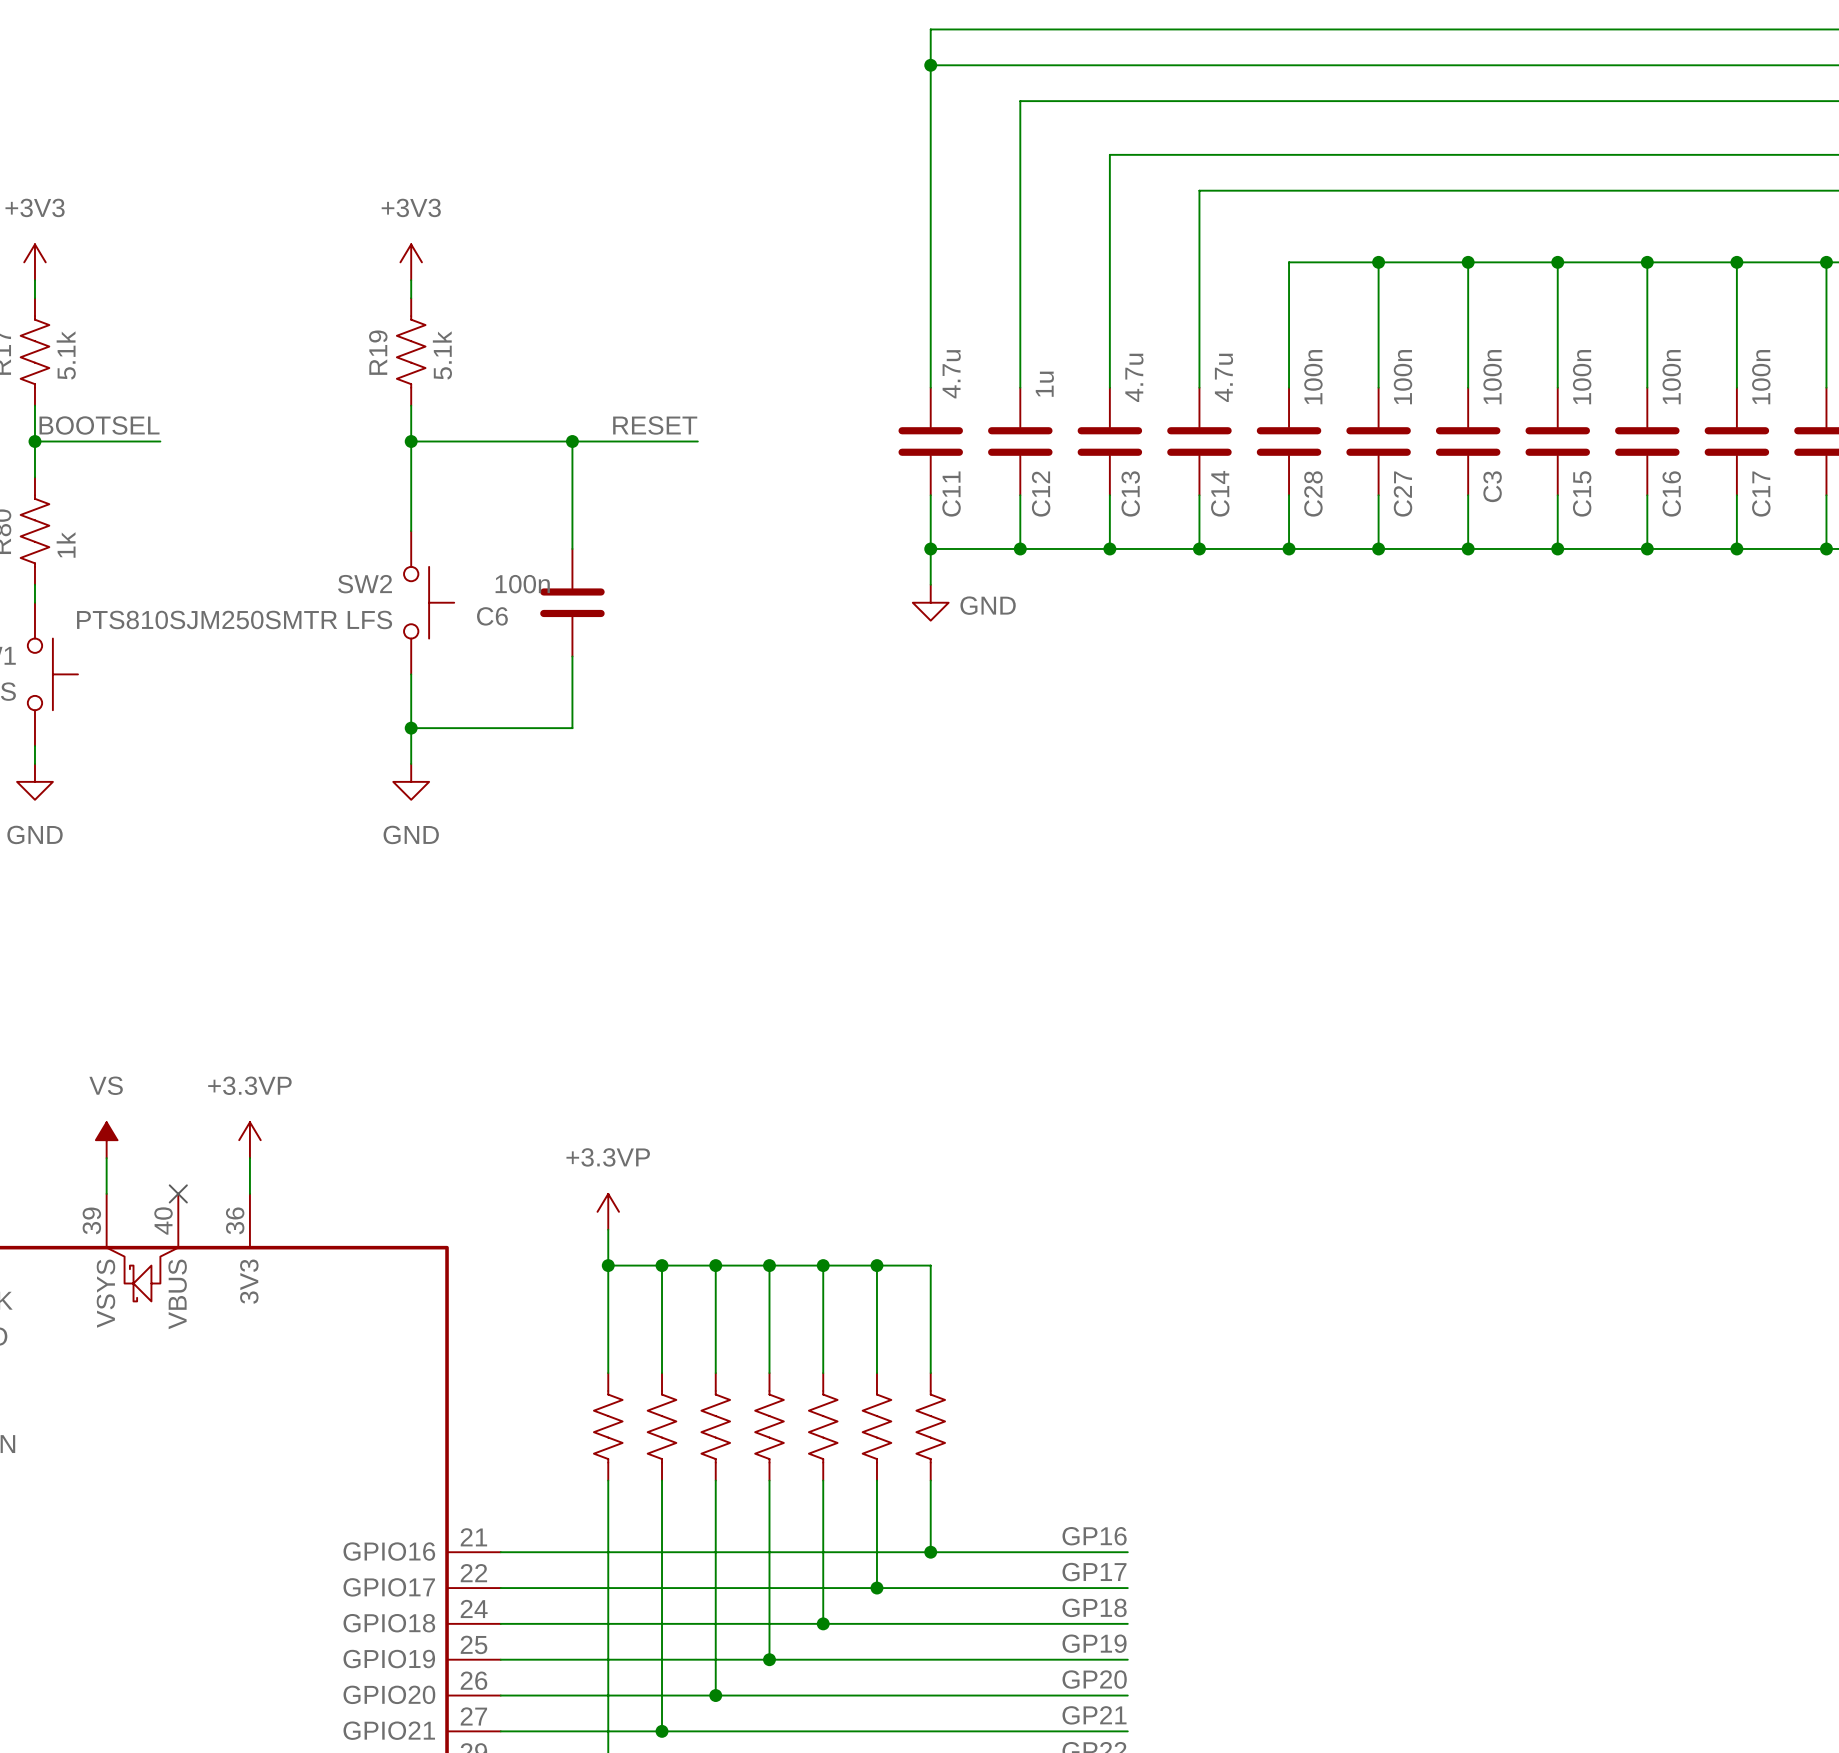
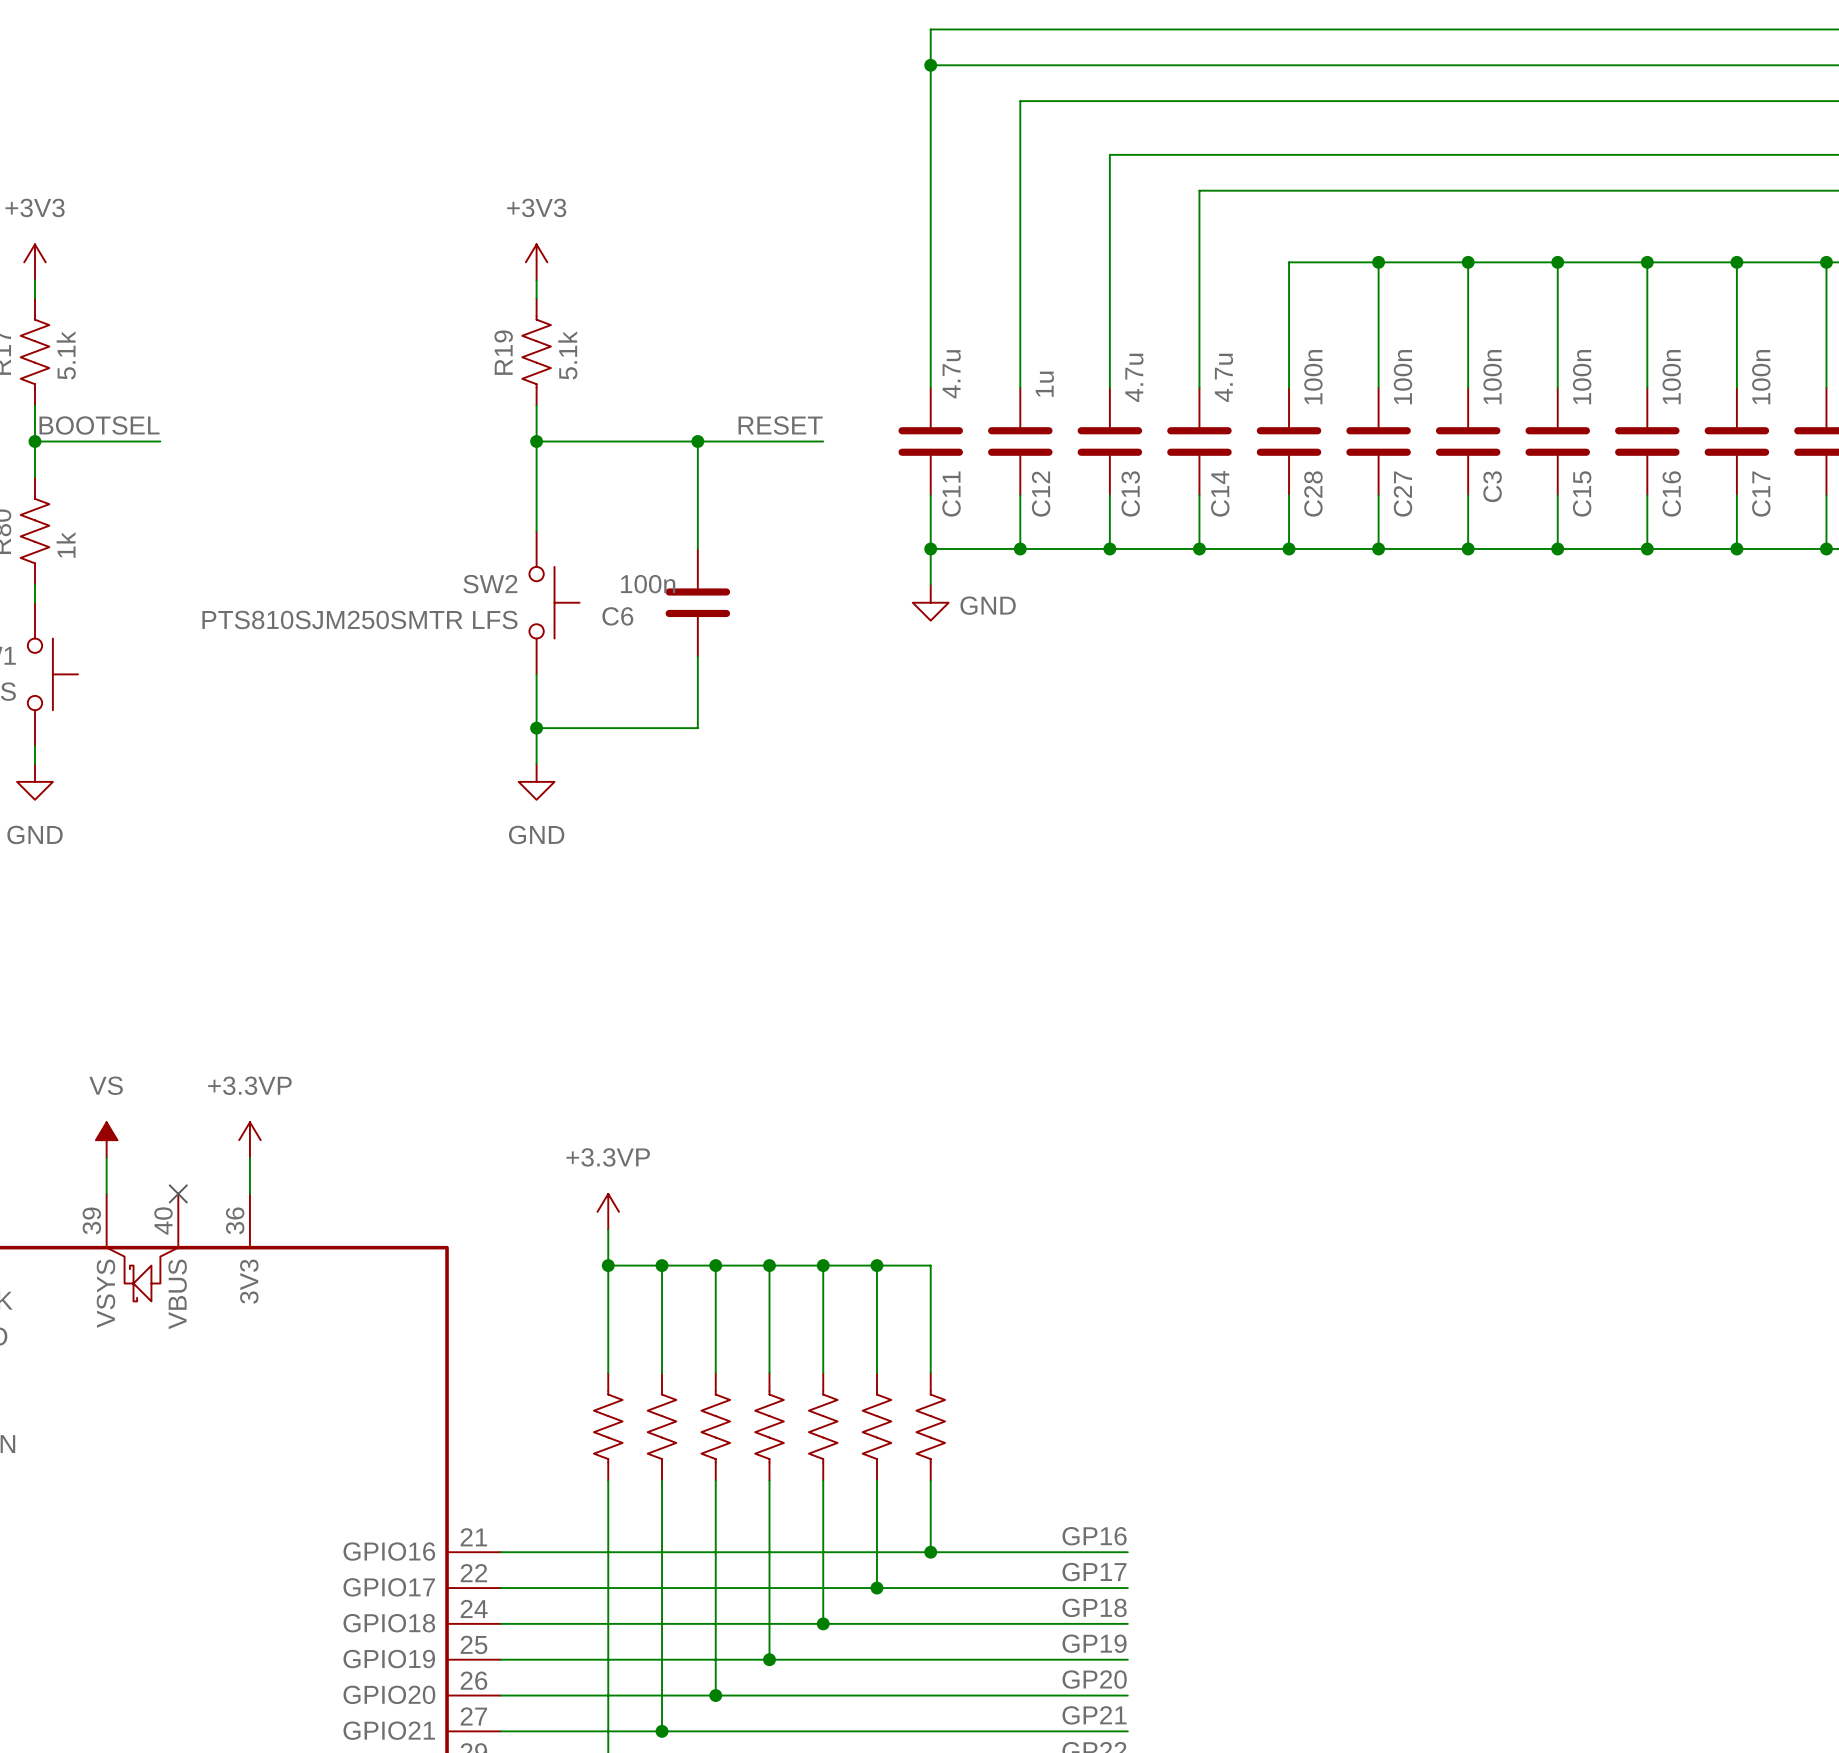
power symbol position: +3V3 (411, 262) -> +3V3 (536, 262)
wire: (411, 280) (411, 298) -> (536, 280) (536, 298)
R19 position: (411, 351) -> (536, 351)
wire: (411, 405) (411, 531) -> (536, 405) (536, 531)
label position: RESET (655, 425) -> RESET (780, 425)
wire: (411, 441) (536, 441) -> none
junction: (411, 441) -> none
wire: (572, 441) (572, 548) -> none
junction position: (572, 441) -> (536, 441)
junction: none -> (697, 441)
wire: none -> (823, 441) (697, 441) (697, 548)
SW2 position: (429, 602) -> (554, 602)
C6 position: (572, 602) -> (697, 602)
wire: (572, 656) (572, 728) -> (697, 656) (697, 728) (572, 728)
wire: (411, 674) (411, 763) -> (536, 674) (536, 763)
wire: (411, 728) (536, 728) -> none
junction: (411, 728) -> none
junction: none -> (536, 728)
power symbol position: GND (411, 781) -> GND (536, 781)

